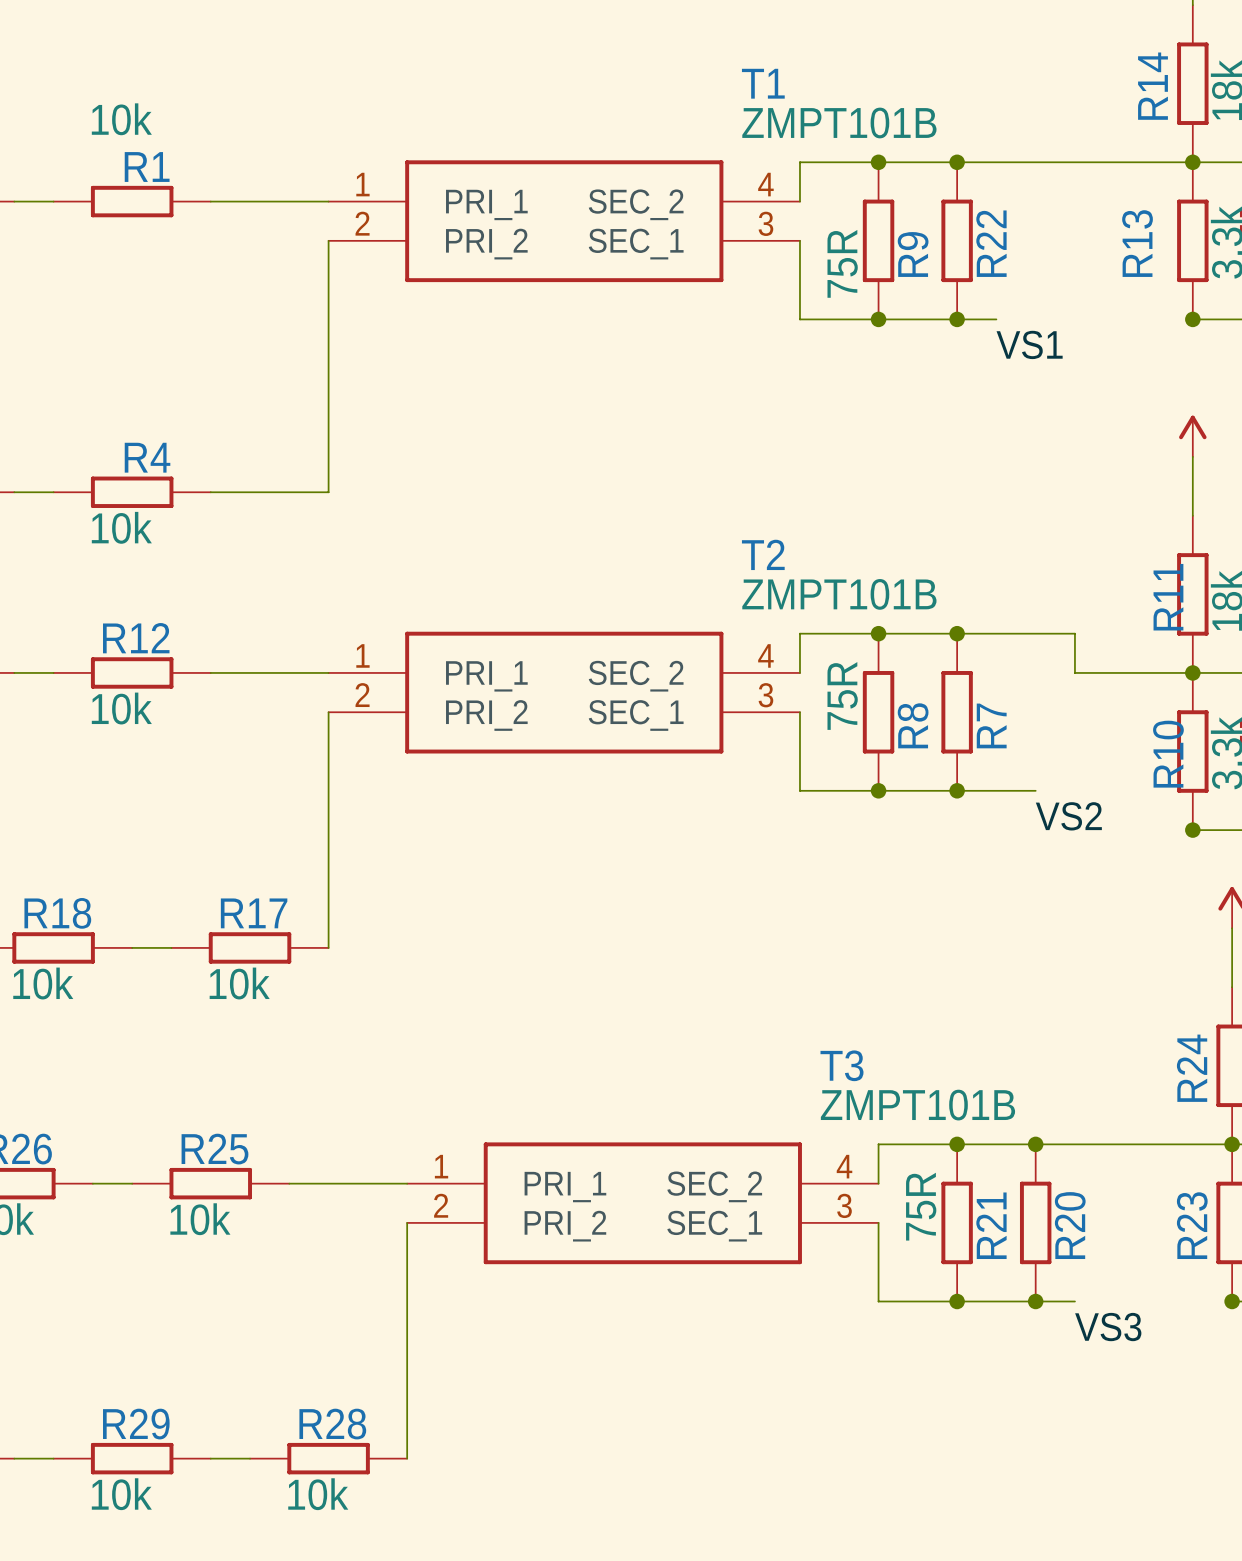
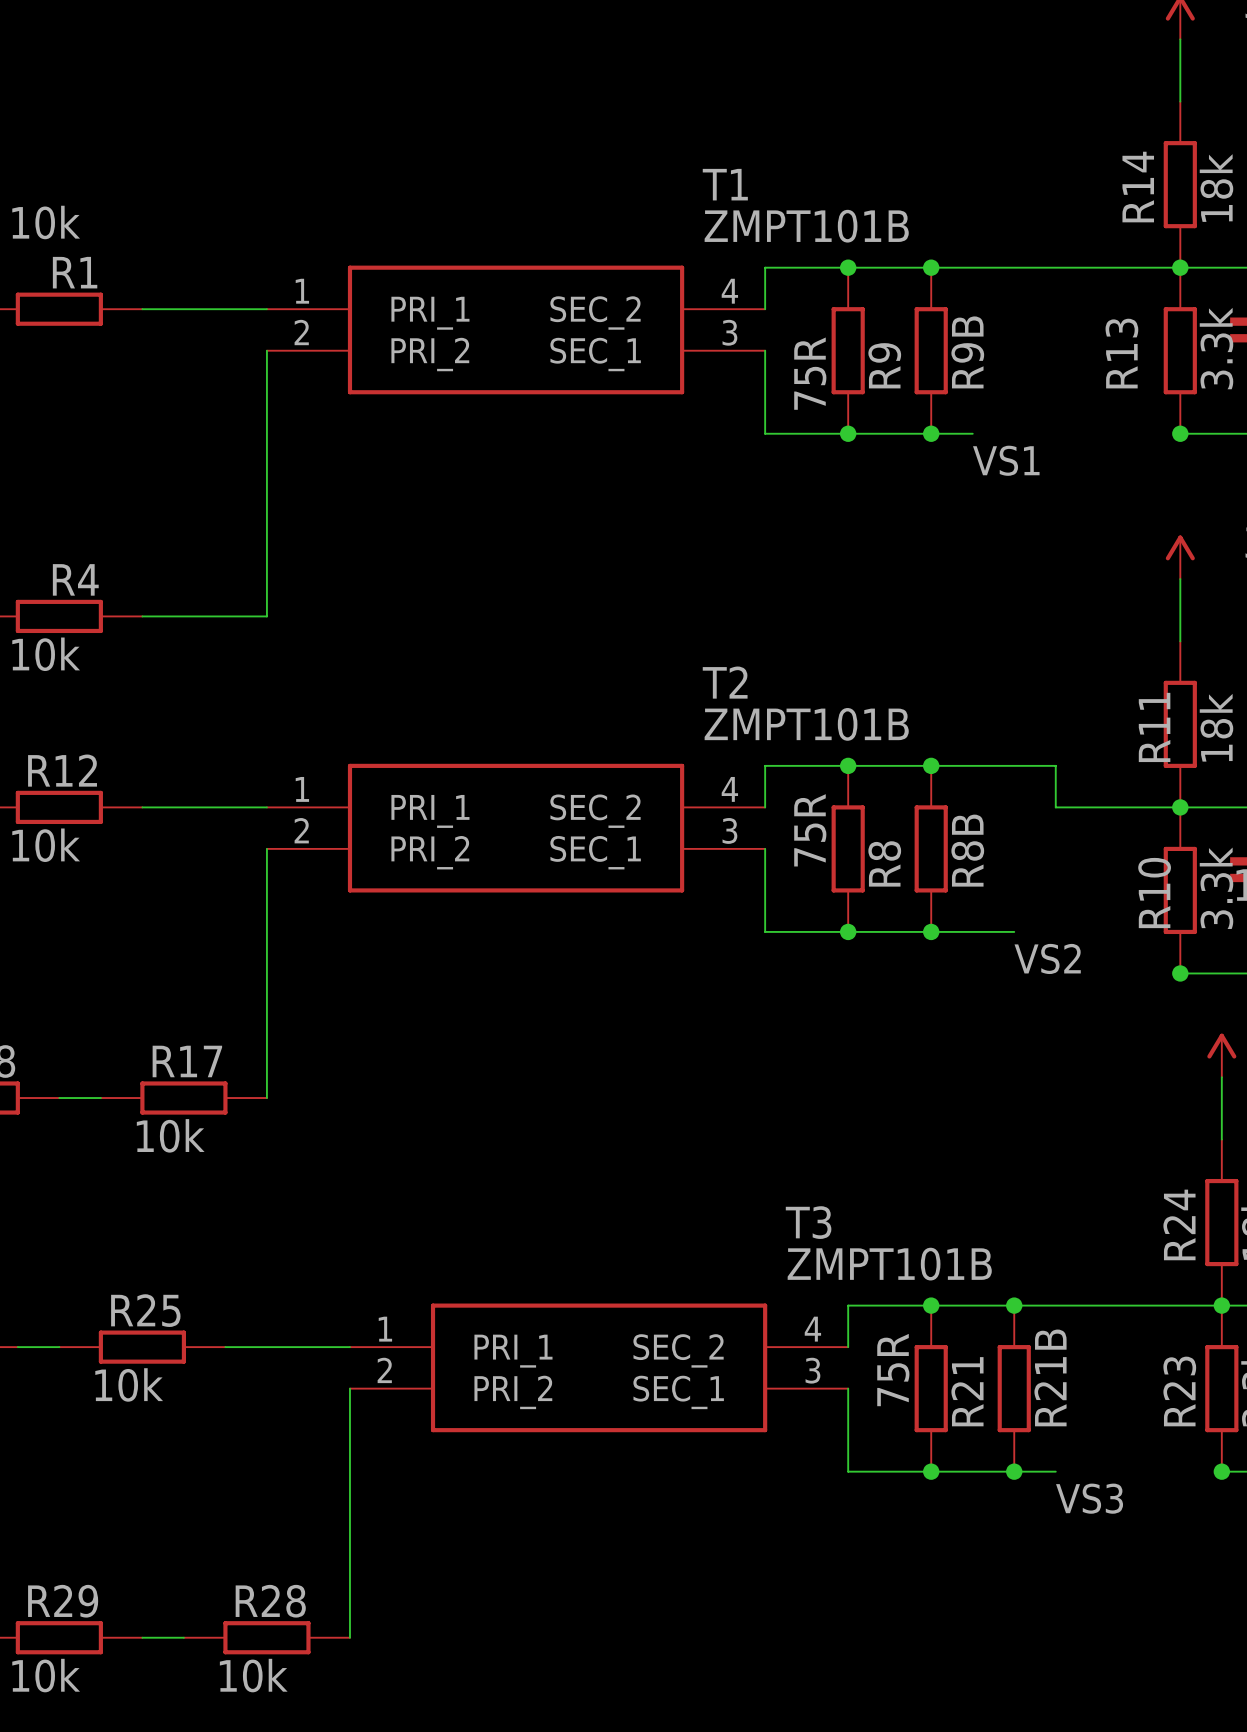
R22 name: R22 (991, 243) -> R9B (967, 352)
R7 name: R7 (991, 725) -> R8B (967, 850)
R20 name: R20 (1070, 1225) -> R21B (1050, 1377)

